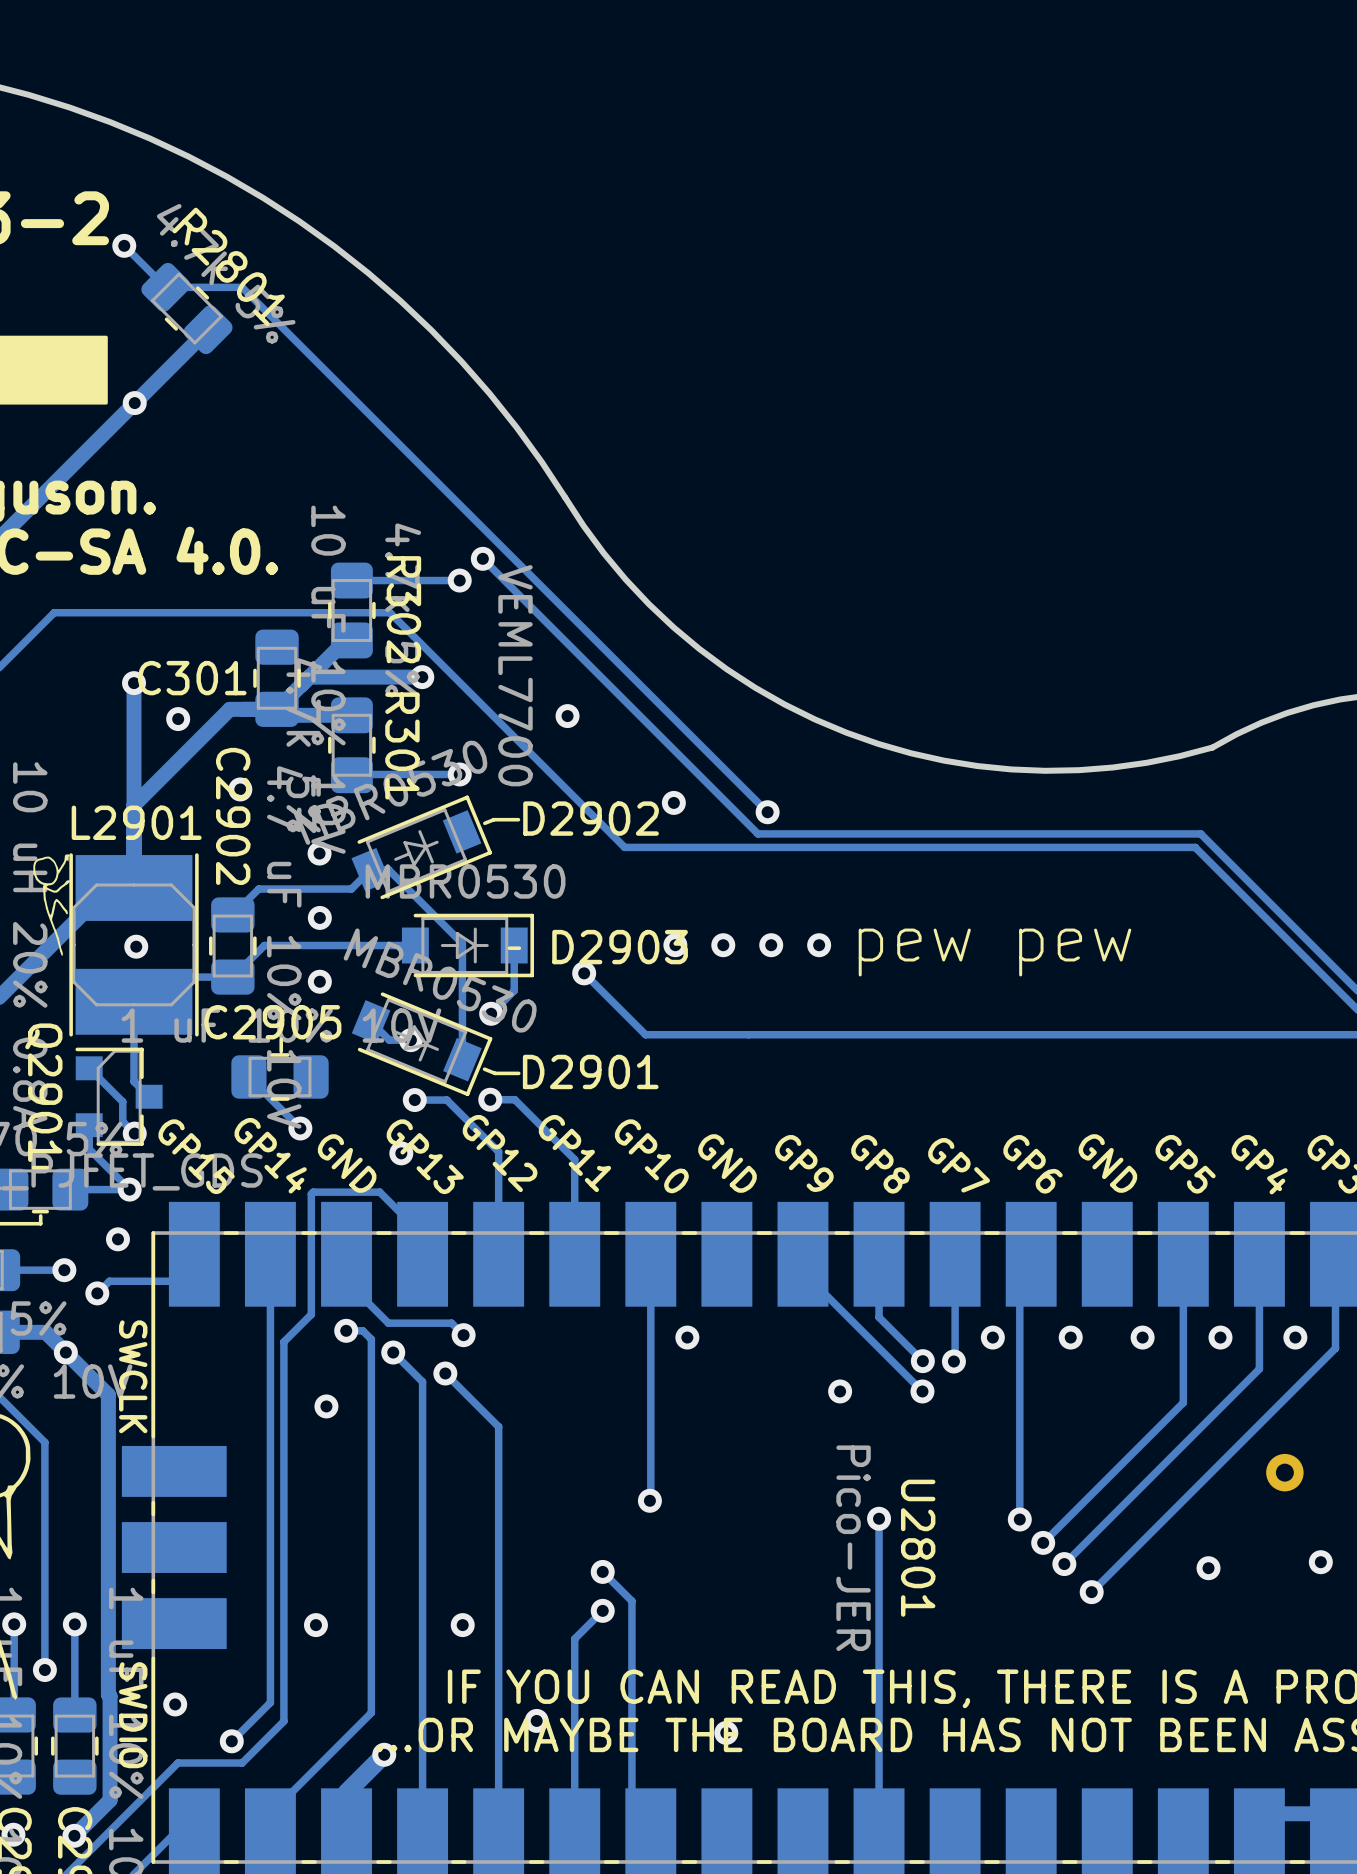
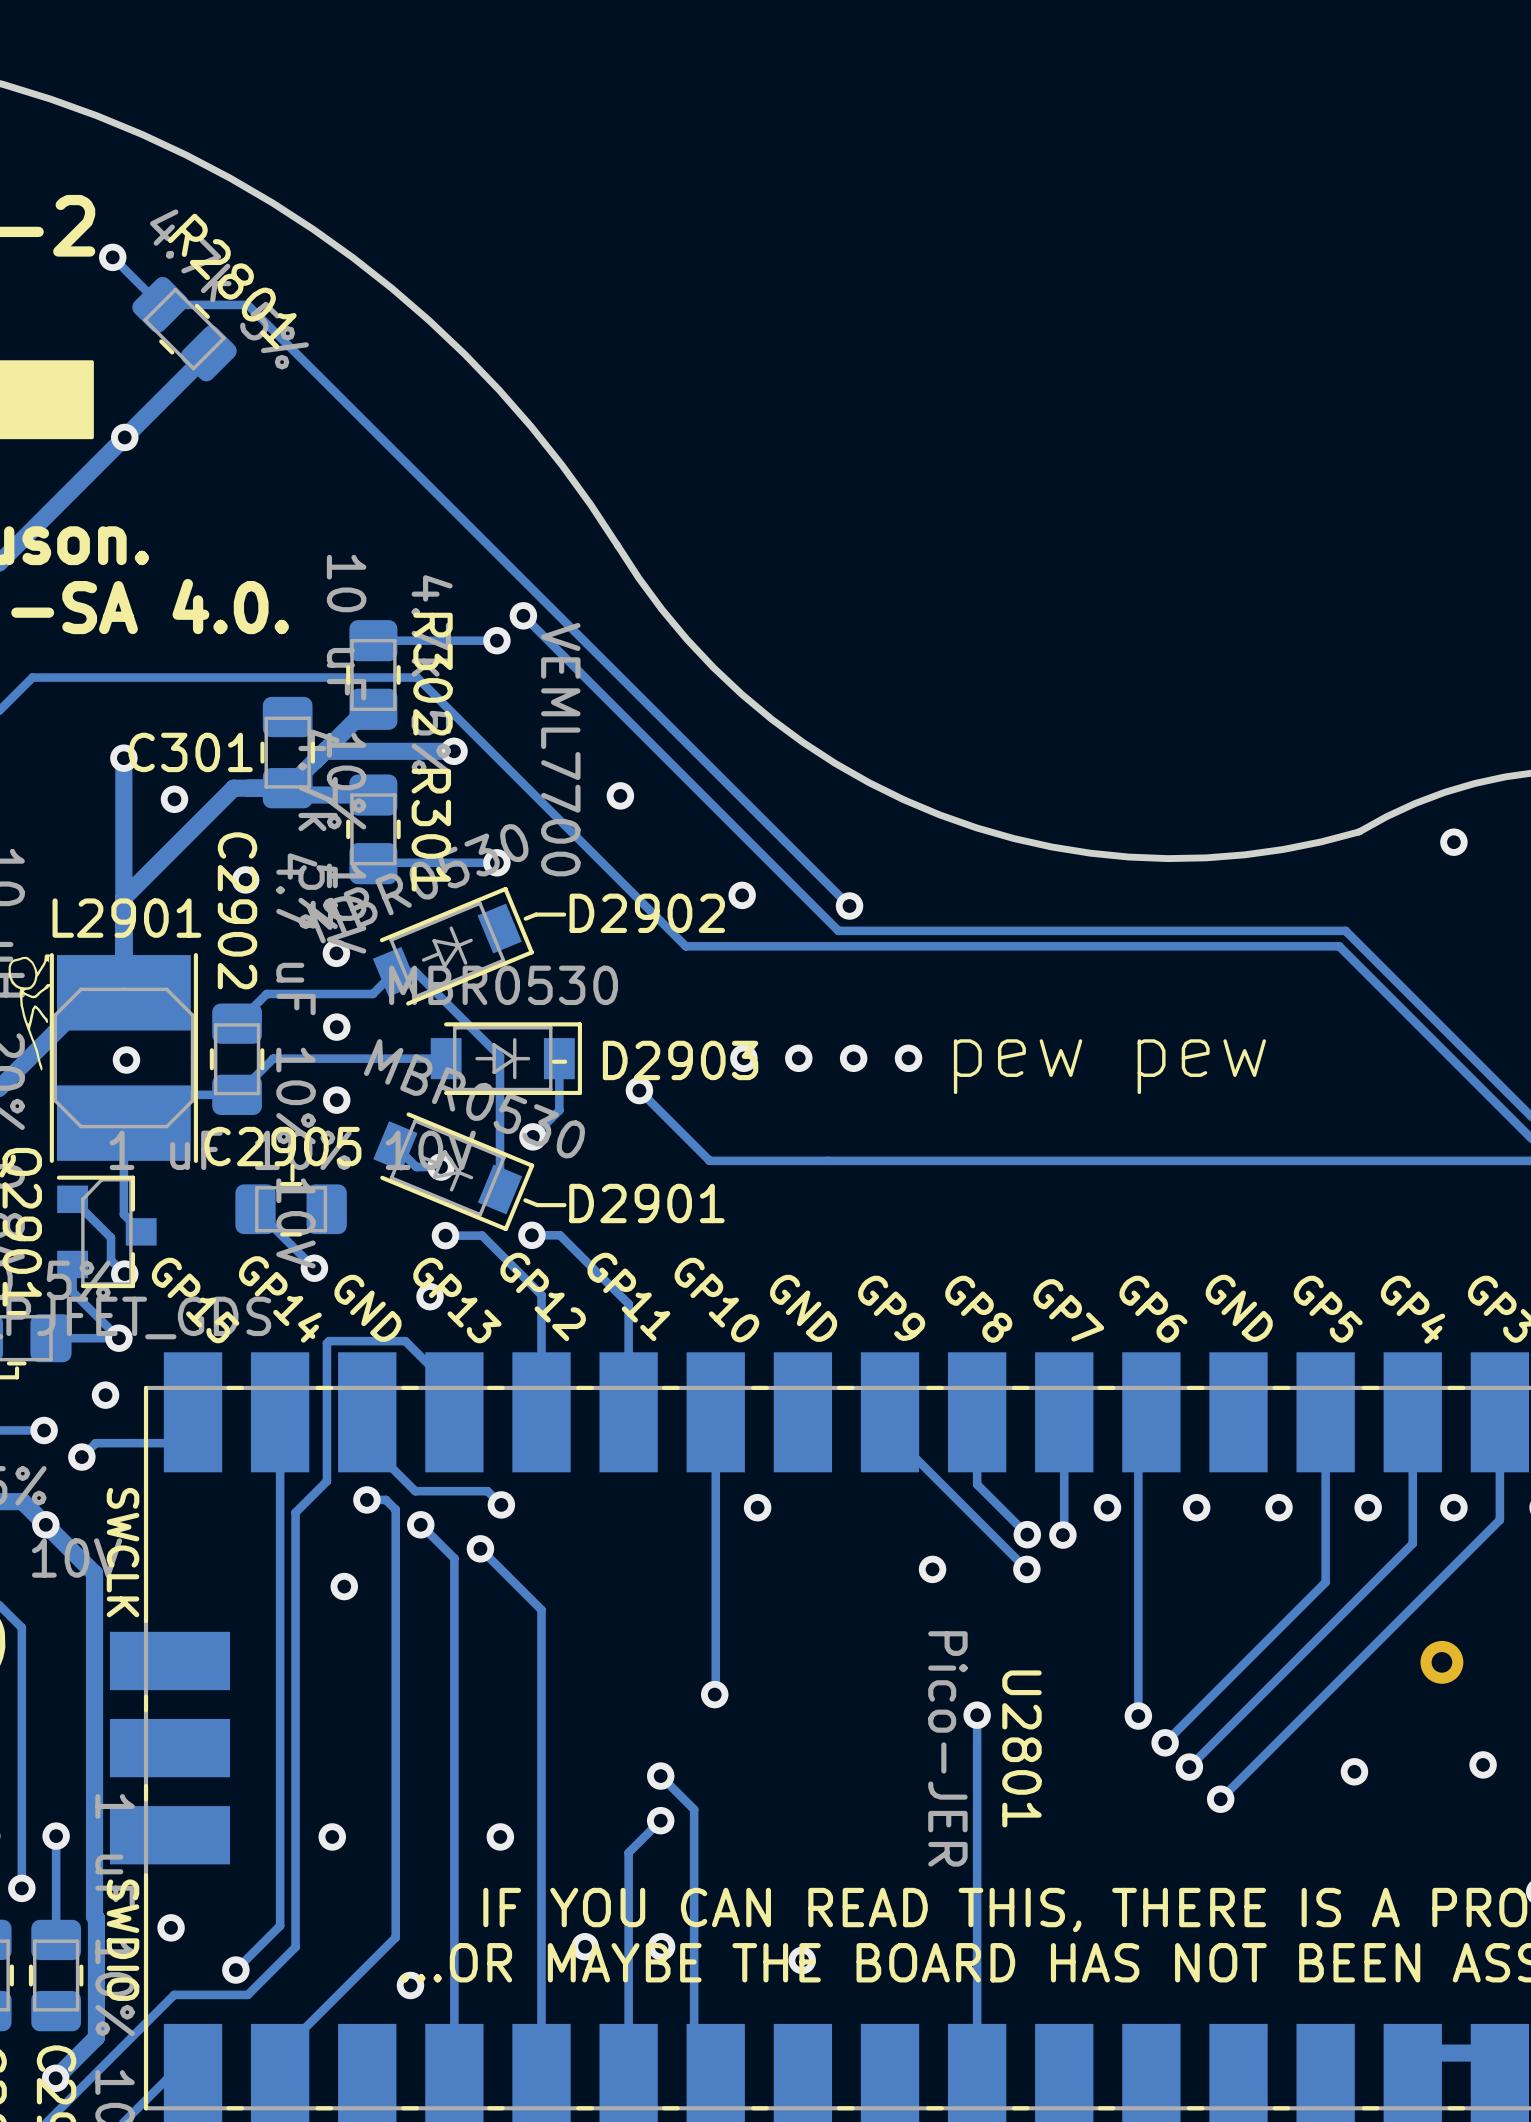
via: none -> (1453, 842)
via: none -> (661, 1946)
track: (384, 1754) (346, 1792) (346, 1813) -> none

